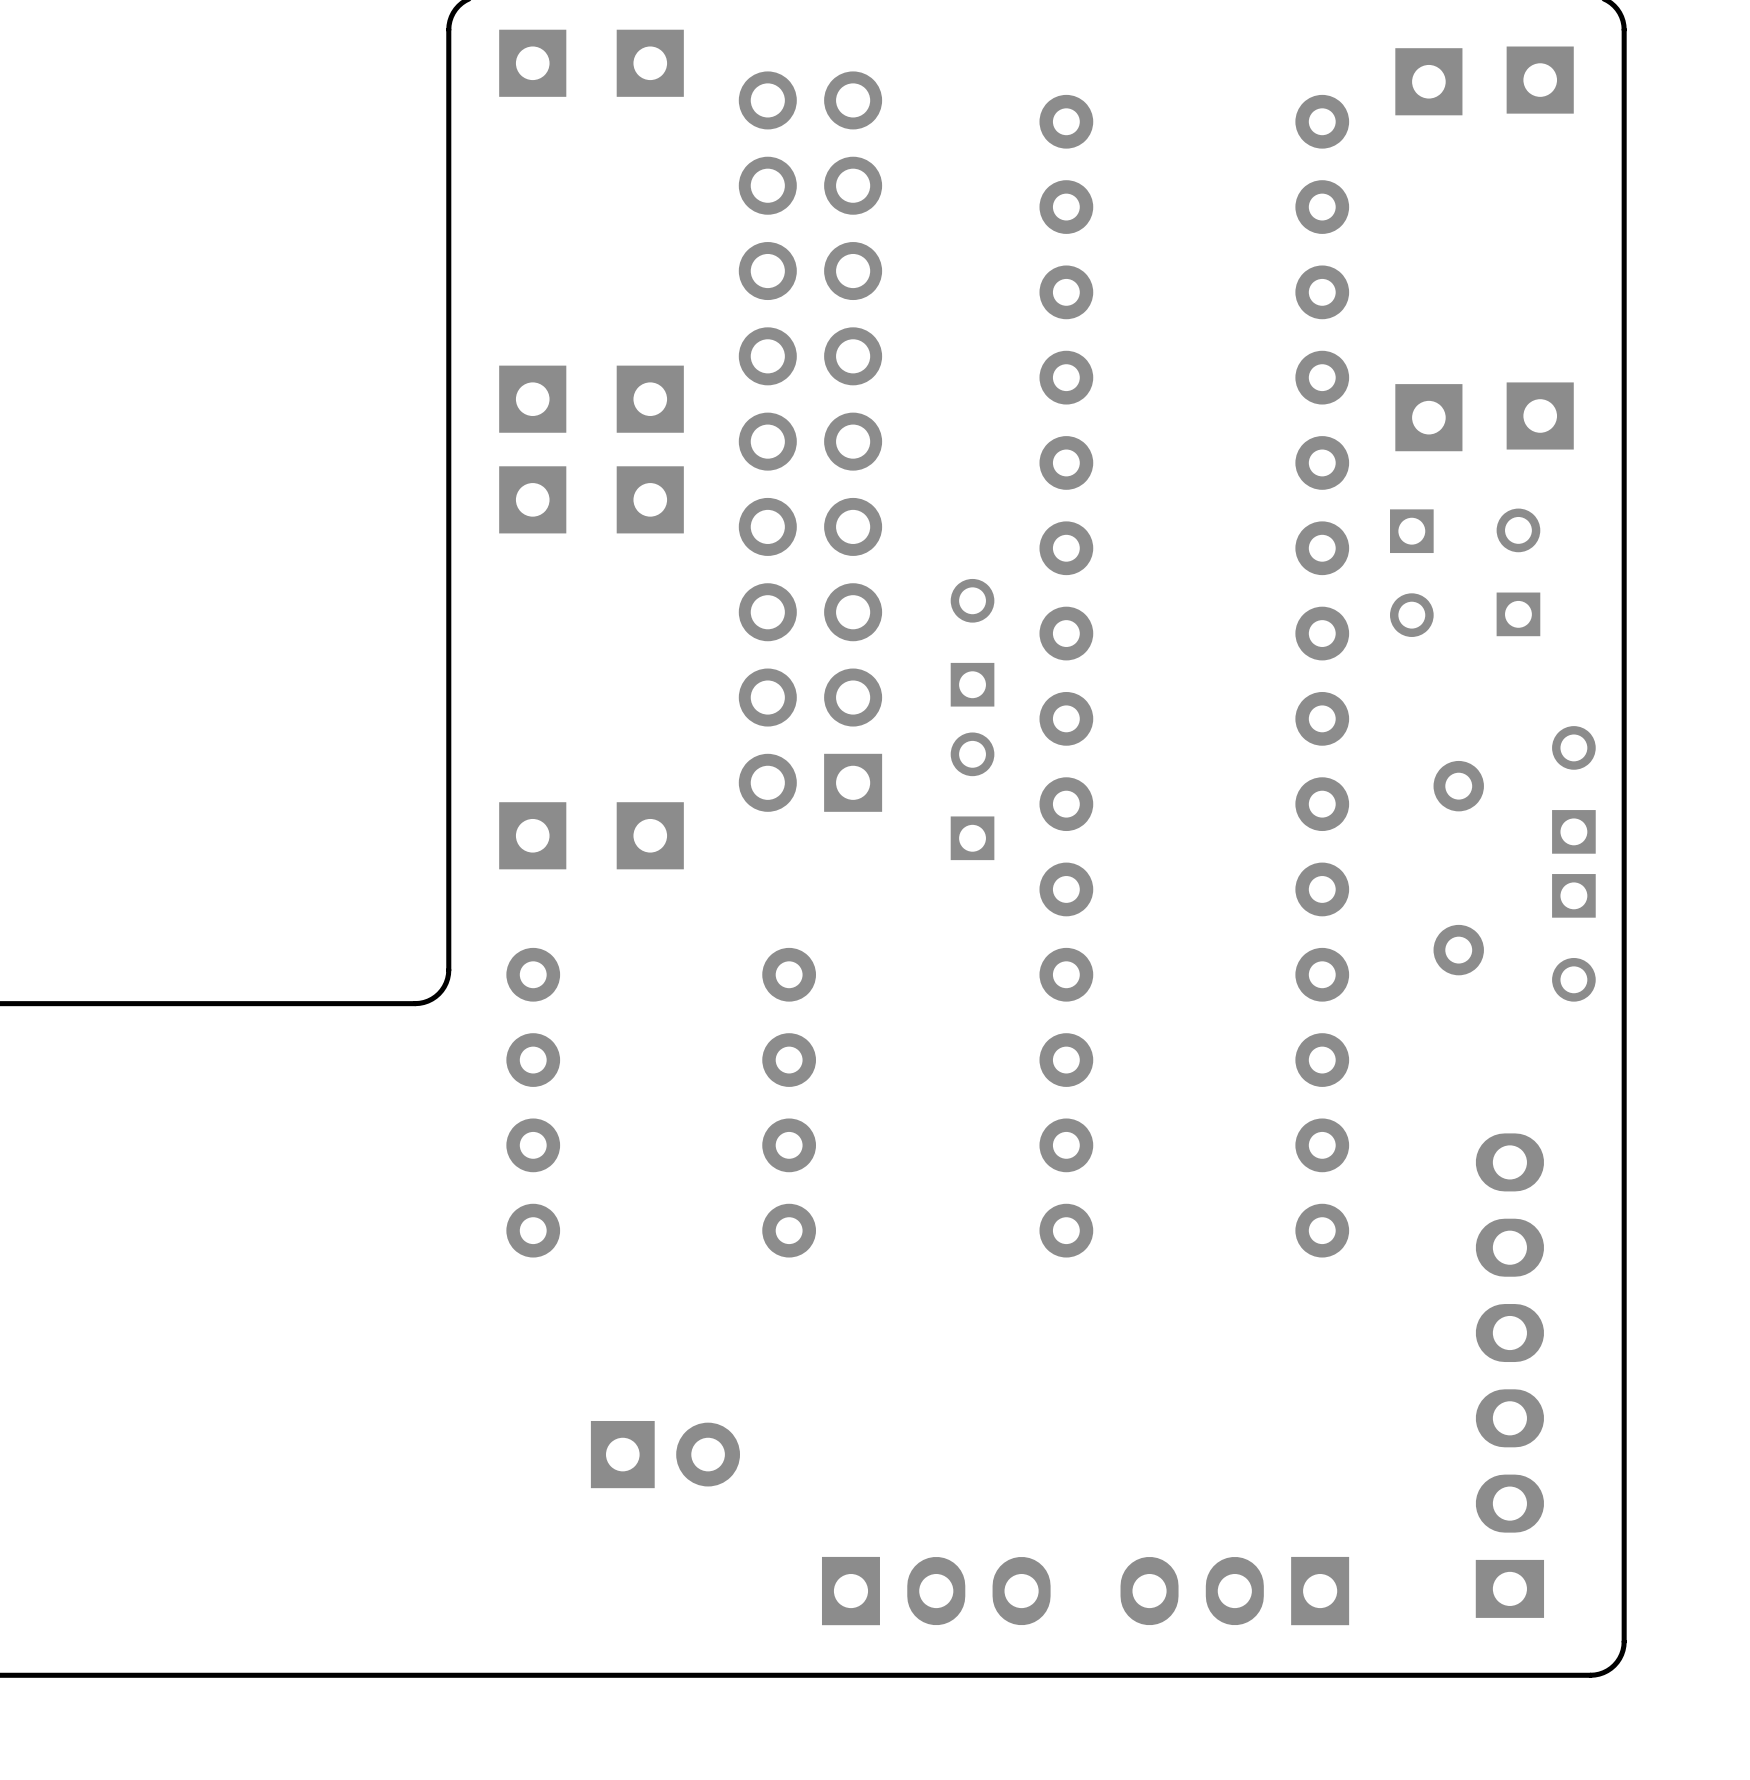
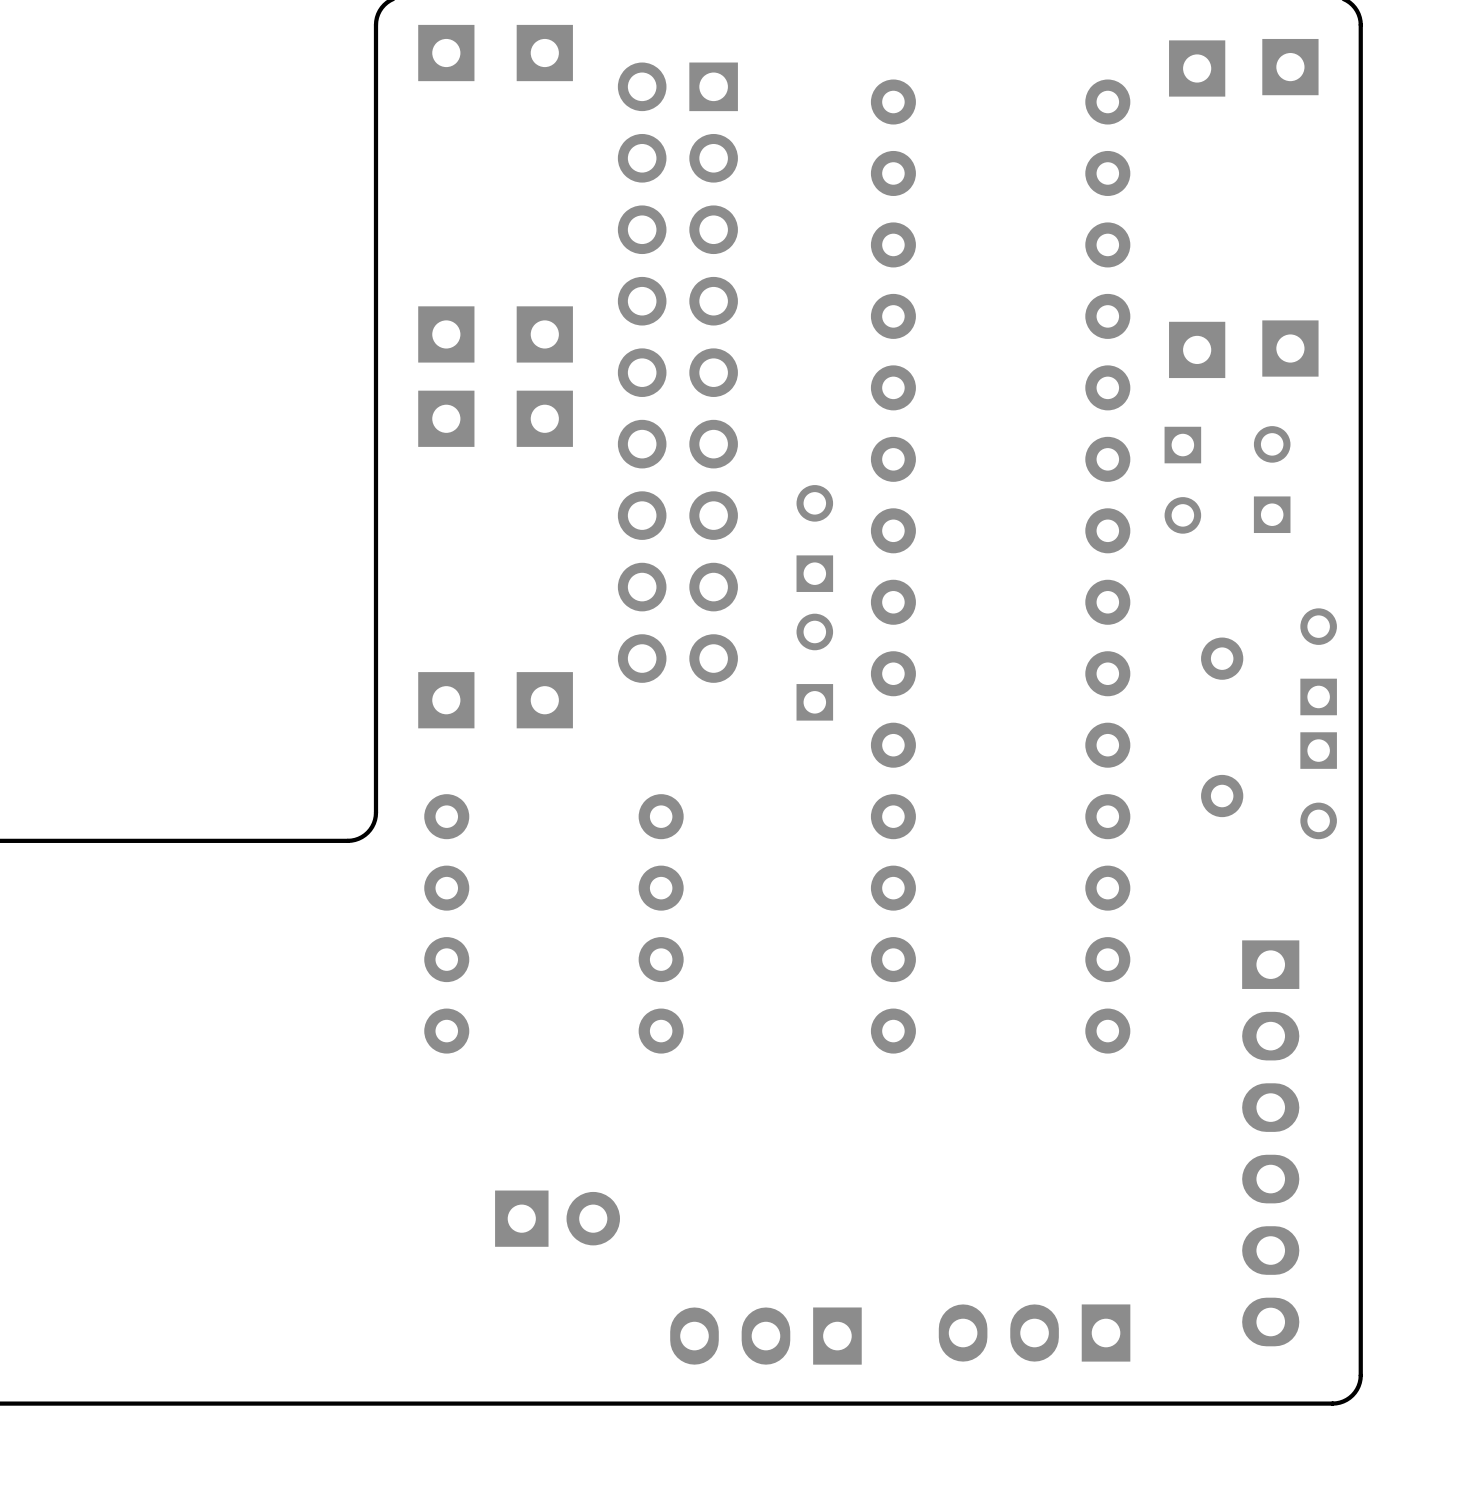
part footprint: [738, 71, 883, 812] -> [617, 62, 738, 683]
part rotation: 0° (1509, 1375) -> 180° (1270, 1143)
part rotation: 0° (936, 1591) -> 180° (765, 1336)

